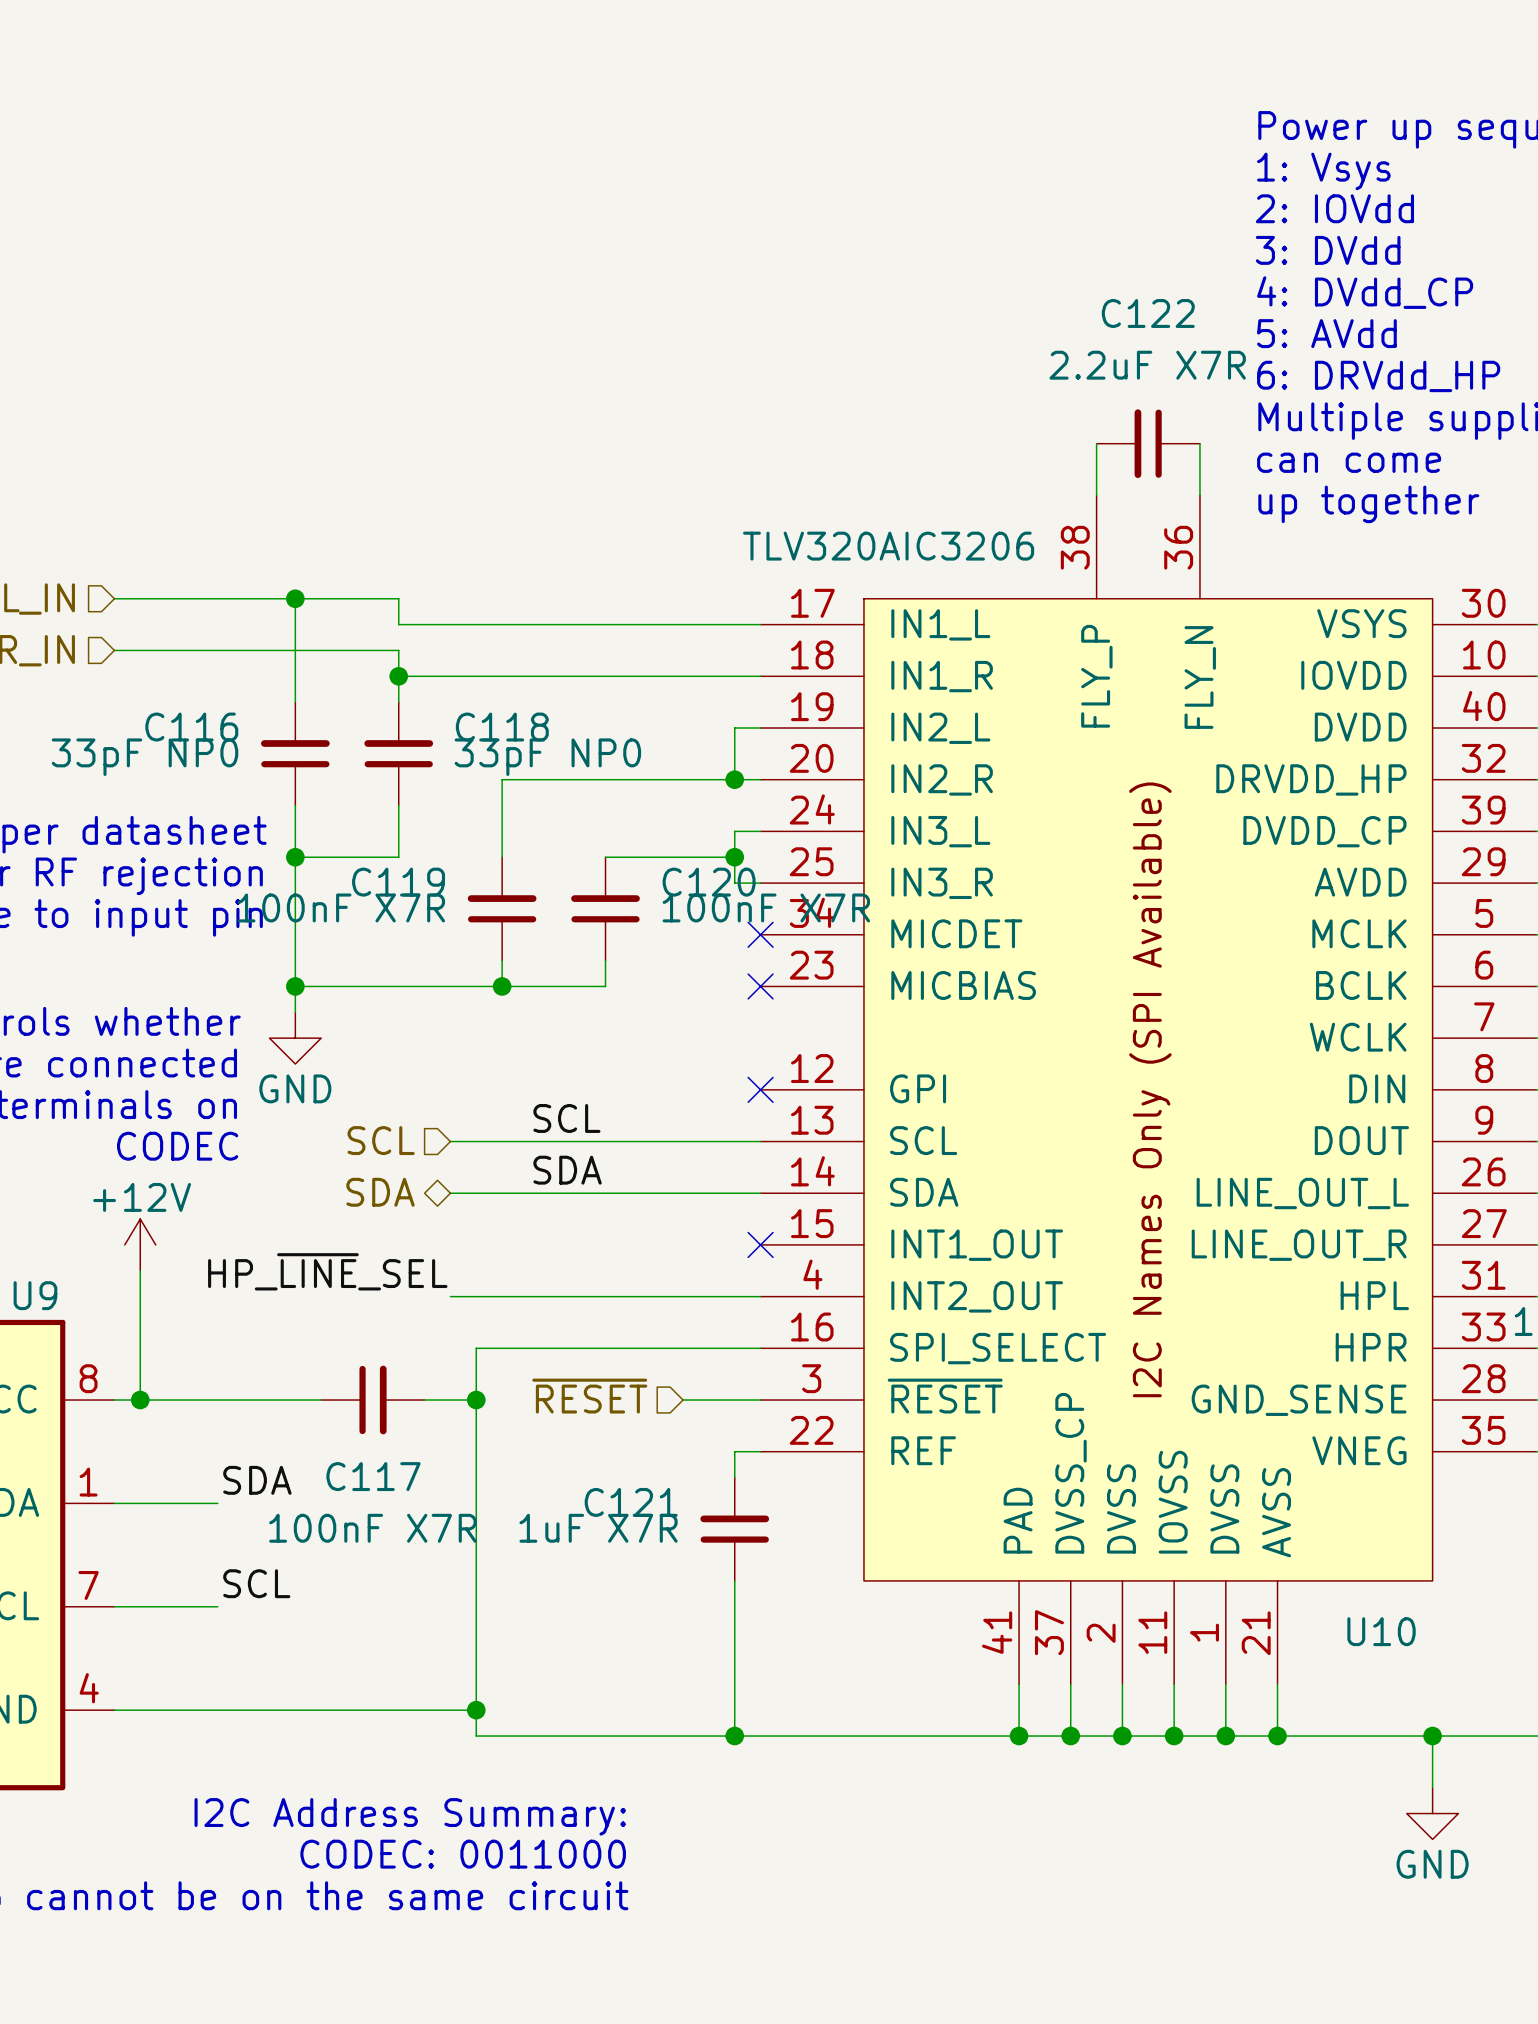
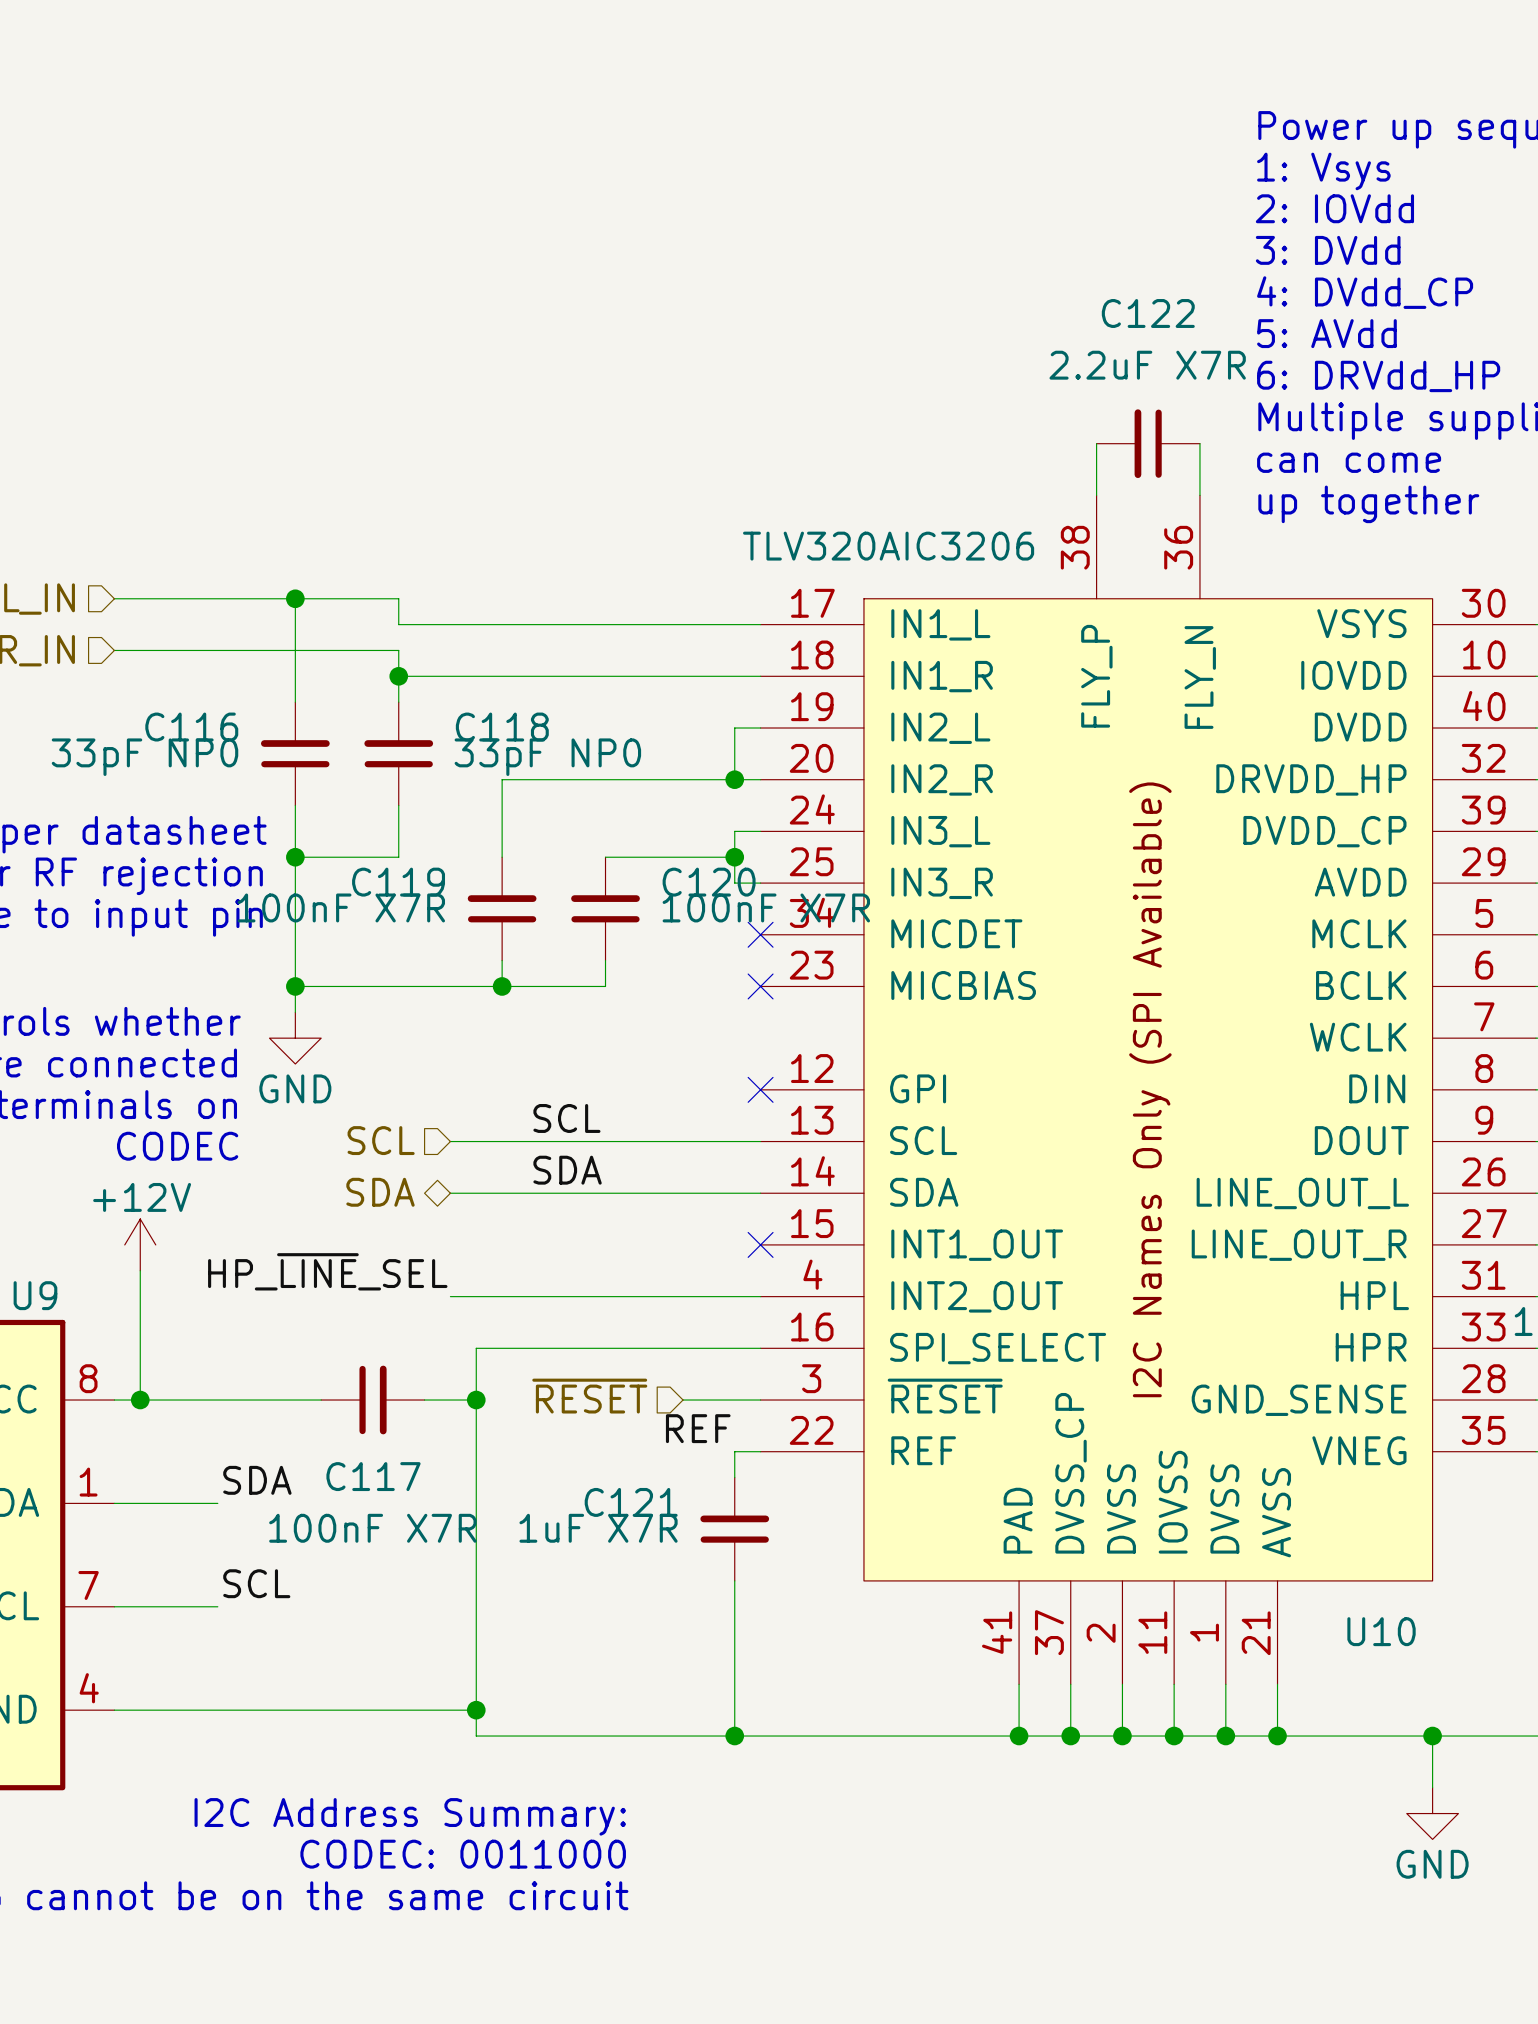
label: none -> REF (698, 1428)

